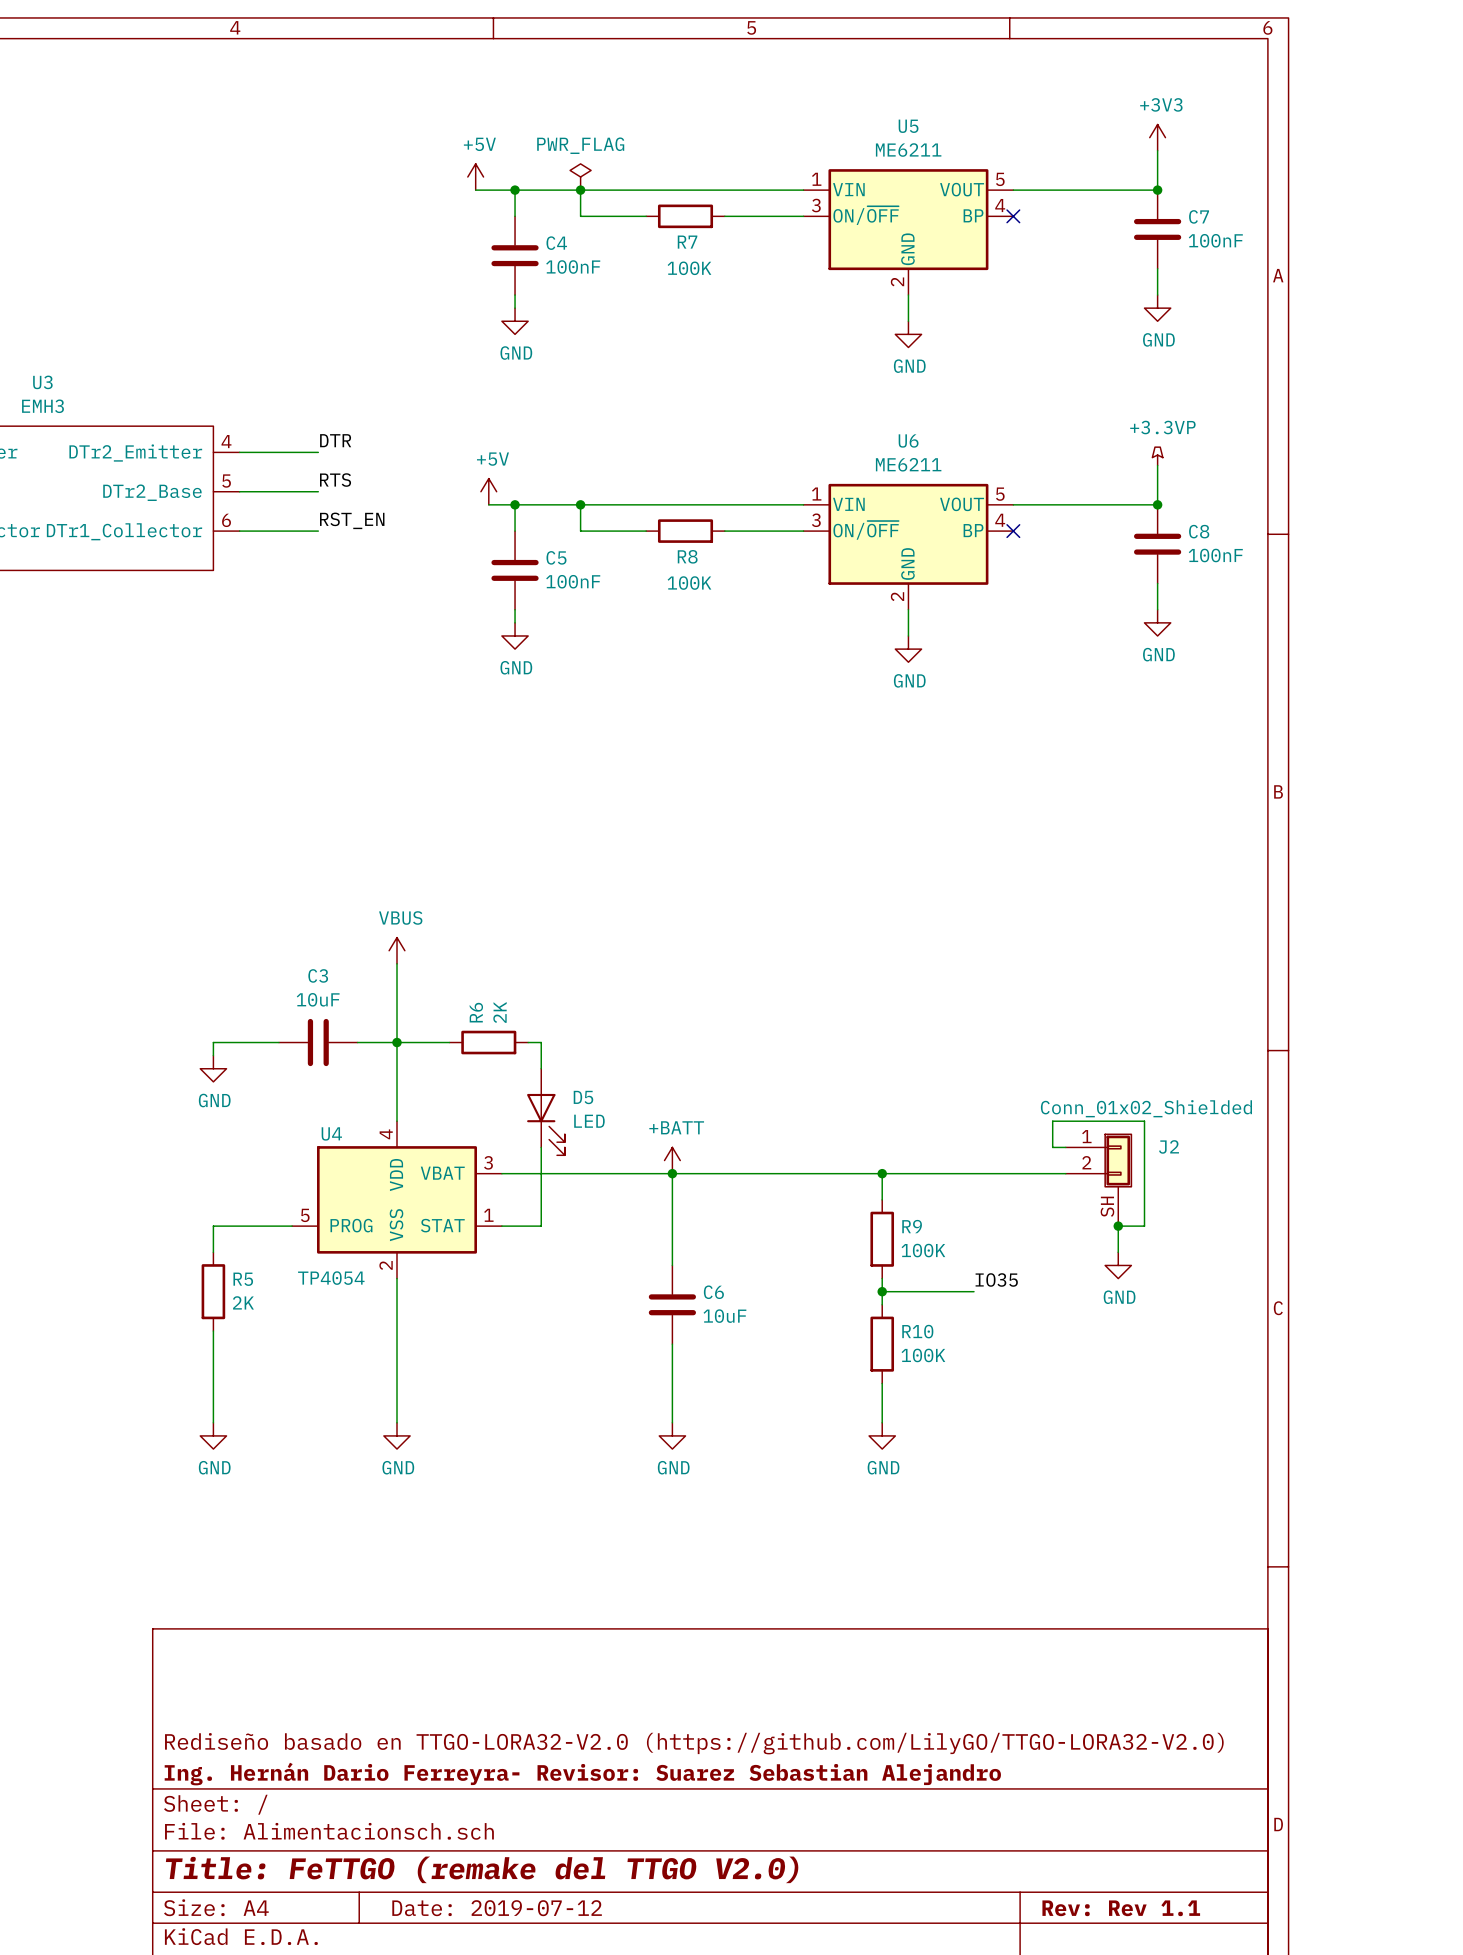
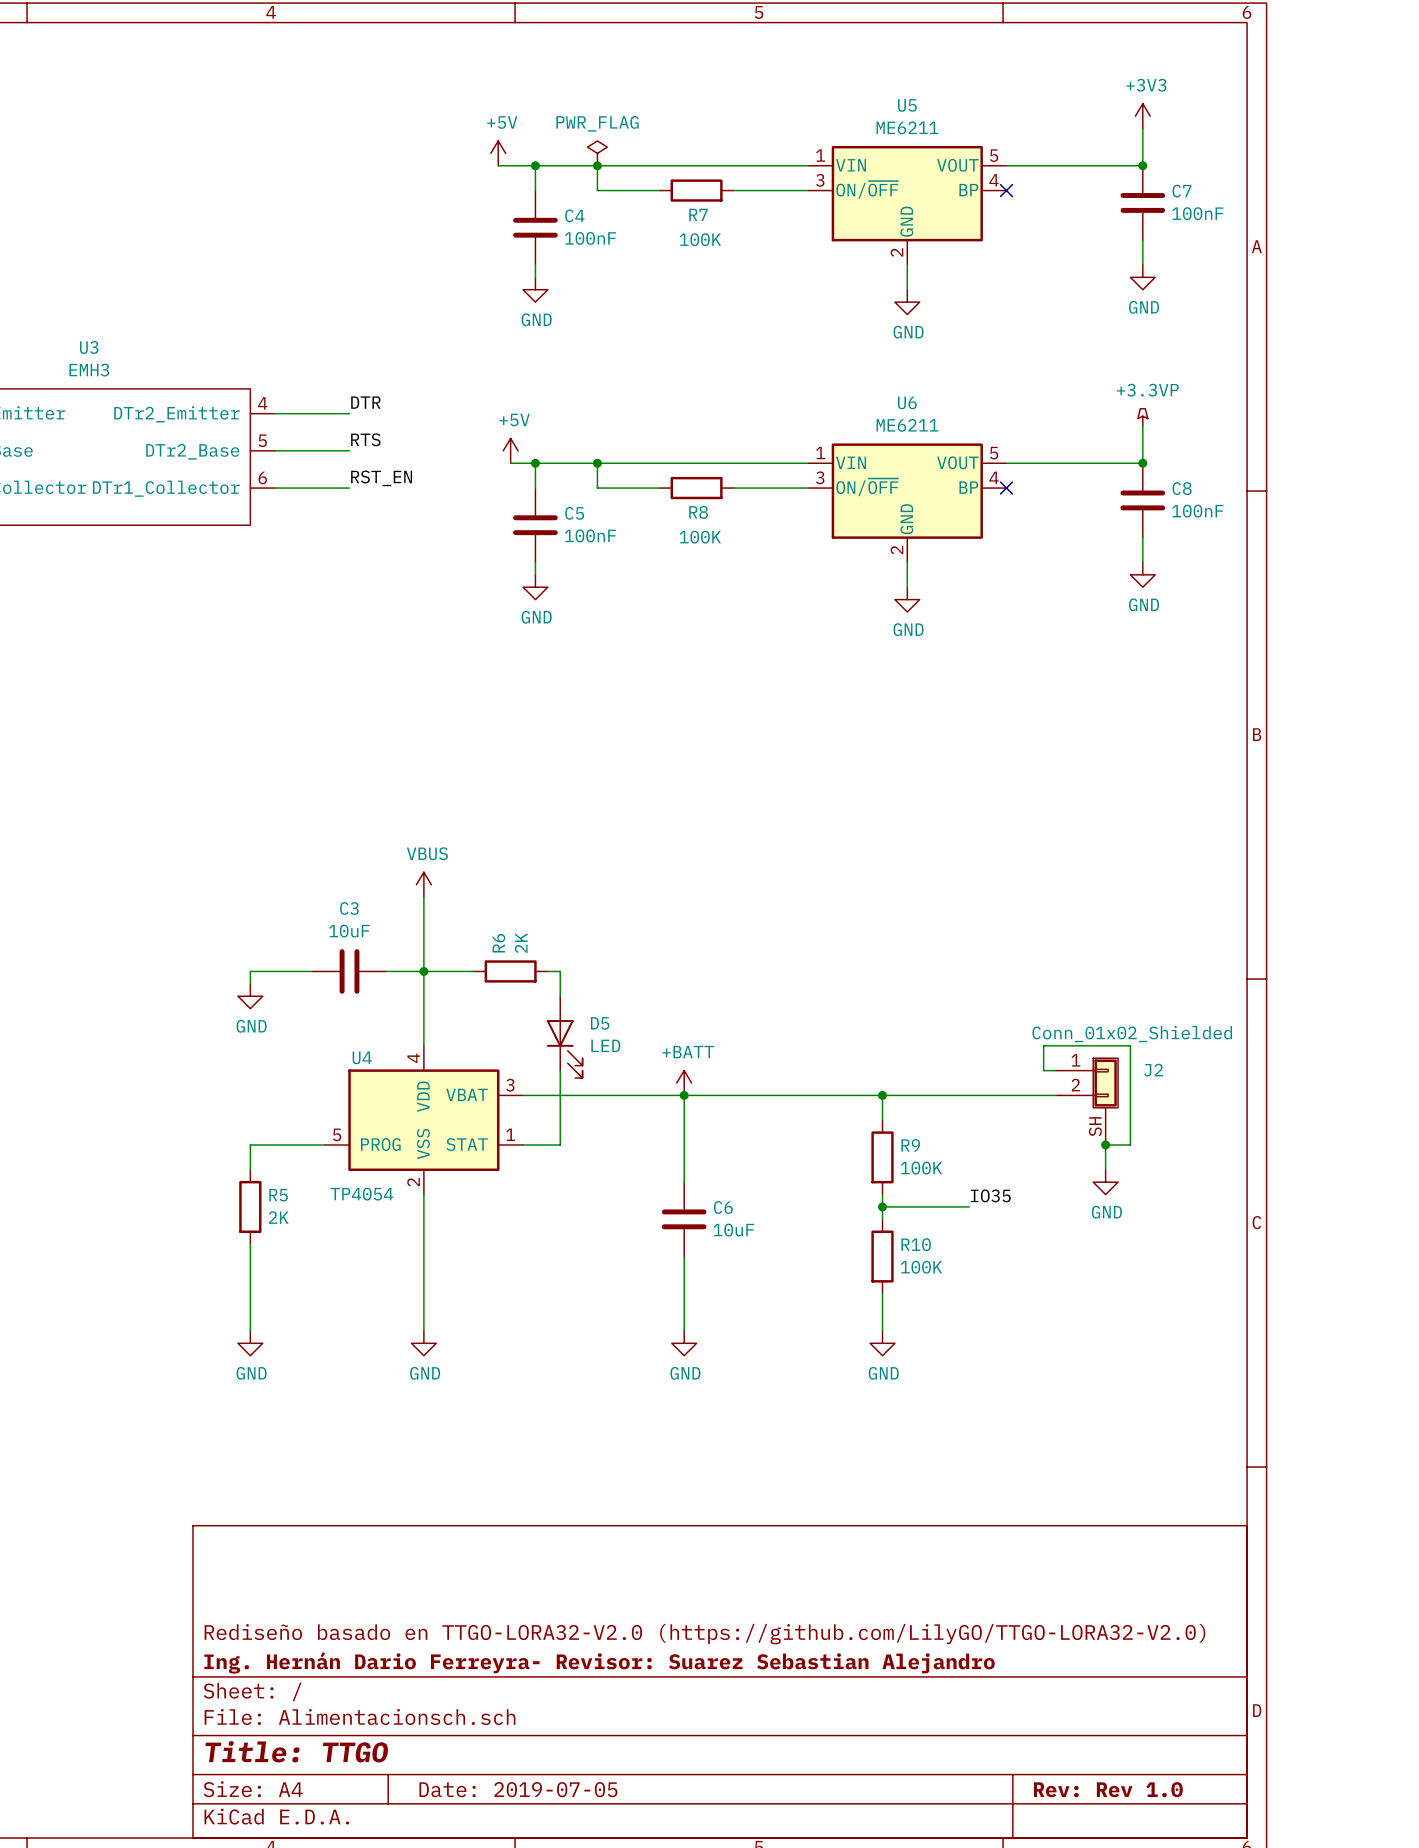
title block: Title: FeTTGO (remake del TTGO V2.0) (482, 1869) -> Title: TTGO (296, 1751)
title block: Date: 2019-07-12 (497, 1908) -> Date: 2019-07-05 (518, 1789)
title block: Rev: Rev 1.1 (1121, 1908) -> Rev: Rev 1.0 (1108, 1789)

